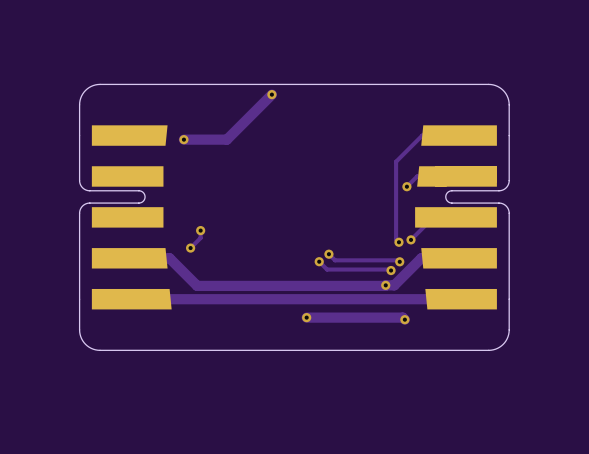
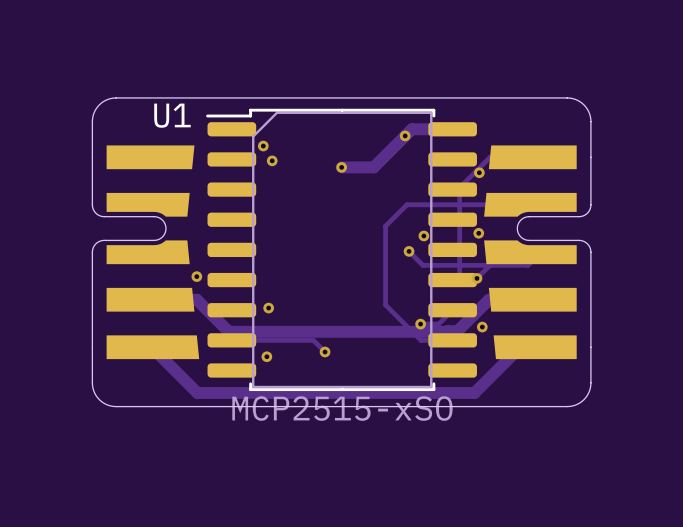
track: (271, 94) (226, 139) (183, 139) -> none
via: (271, 94) -> none
track: none -> (452, 129) (411, 129) (373, 167) (341, 167)
via: none -> (405, 135)
part footprint: [79, 125, 172, 310] -> [91, 145, 200, 360]
via: none -> (263, 146)
part footprint: [415, 125, 510, 310] -> [484, 145, 592, 360]
via: none -> (272, 160)
via: (183, 139) -> none
via: none -> (341, 167)
via: none -> (479, 172)
track: (417, 176) (406, 186) -> (484, 204) (406, 204) (385, 226) (385, 305) (420, 340) (452, 340)
via position: (406, 186) -> (478, 233)
via: none -> (423, 235)
U1: none -> MCP2515-xSO (341, 249)
track: none -> (409, 251) (422, 265) (528, 265) (541, 252)
via: none -> (409, 251)
track: (200, 230) (200, 238) (190, 248) -> none
via: (200, 230) -> none
via: none -> (196, 276)
via: (398, 242) -> none
via: (190, 248) -> none
track: (328, 254) (335, 260) (399, 261) -> none
via: (328, 254) -> none
track: (319, 261) (327, 269) (391, 270) -> none
via: (319, 261) -> none
via: (399, 261) -> none
via: none -> (268, 308)
track: none -> (452, 310) (438, 324) (420, 324)
via: (391, 270) -> none
via: none -> (420, 324)
via: none -> (482, 327)
via: (385, 285) -> none
track: none -> (231, 340) (313, 340) (325, 351)
track: (448, 299) (130, 299) -> (520, 347) (474, 392) (197, 392) (151, 347)
via: none -> (325, 351)
via: none -> (266, 356)
track: (306, 317) (402, 317) (404, 319) -> none
via: (306, 317) -> none
via: (404, 319) -> none

